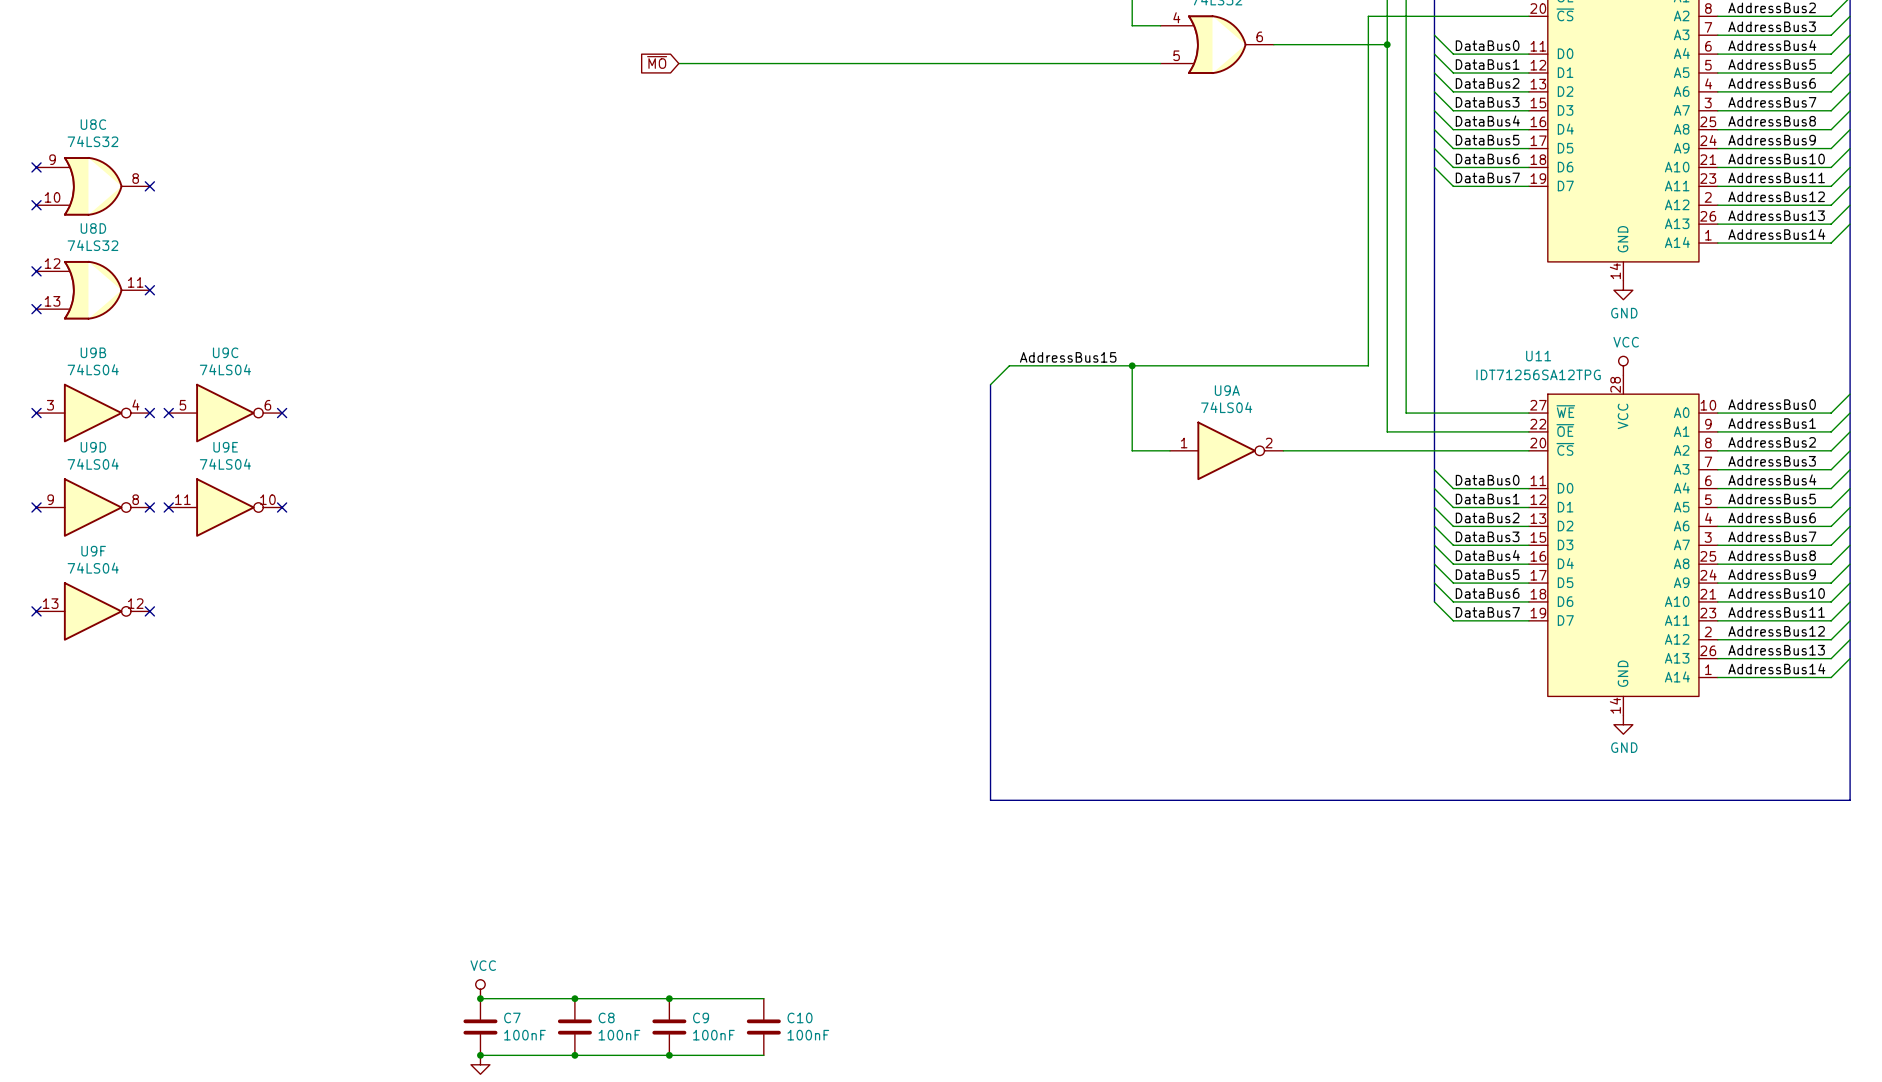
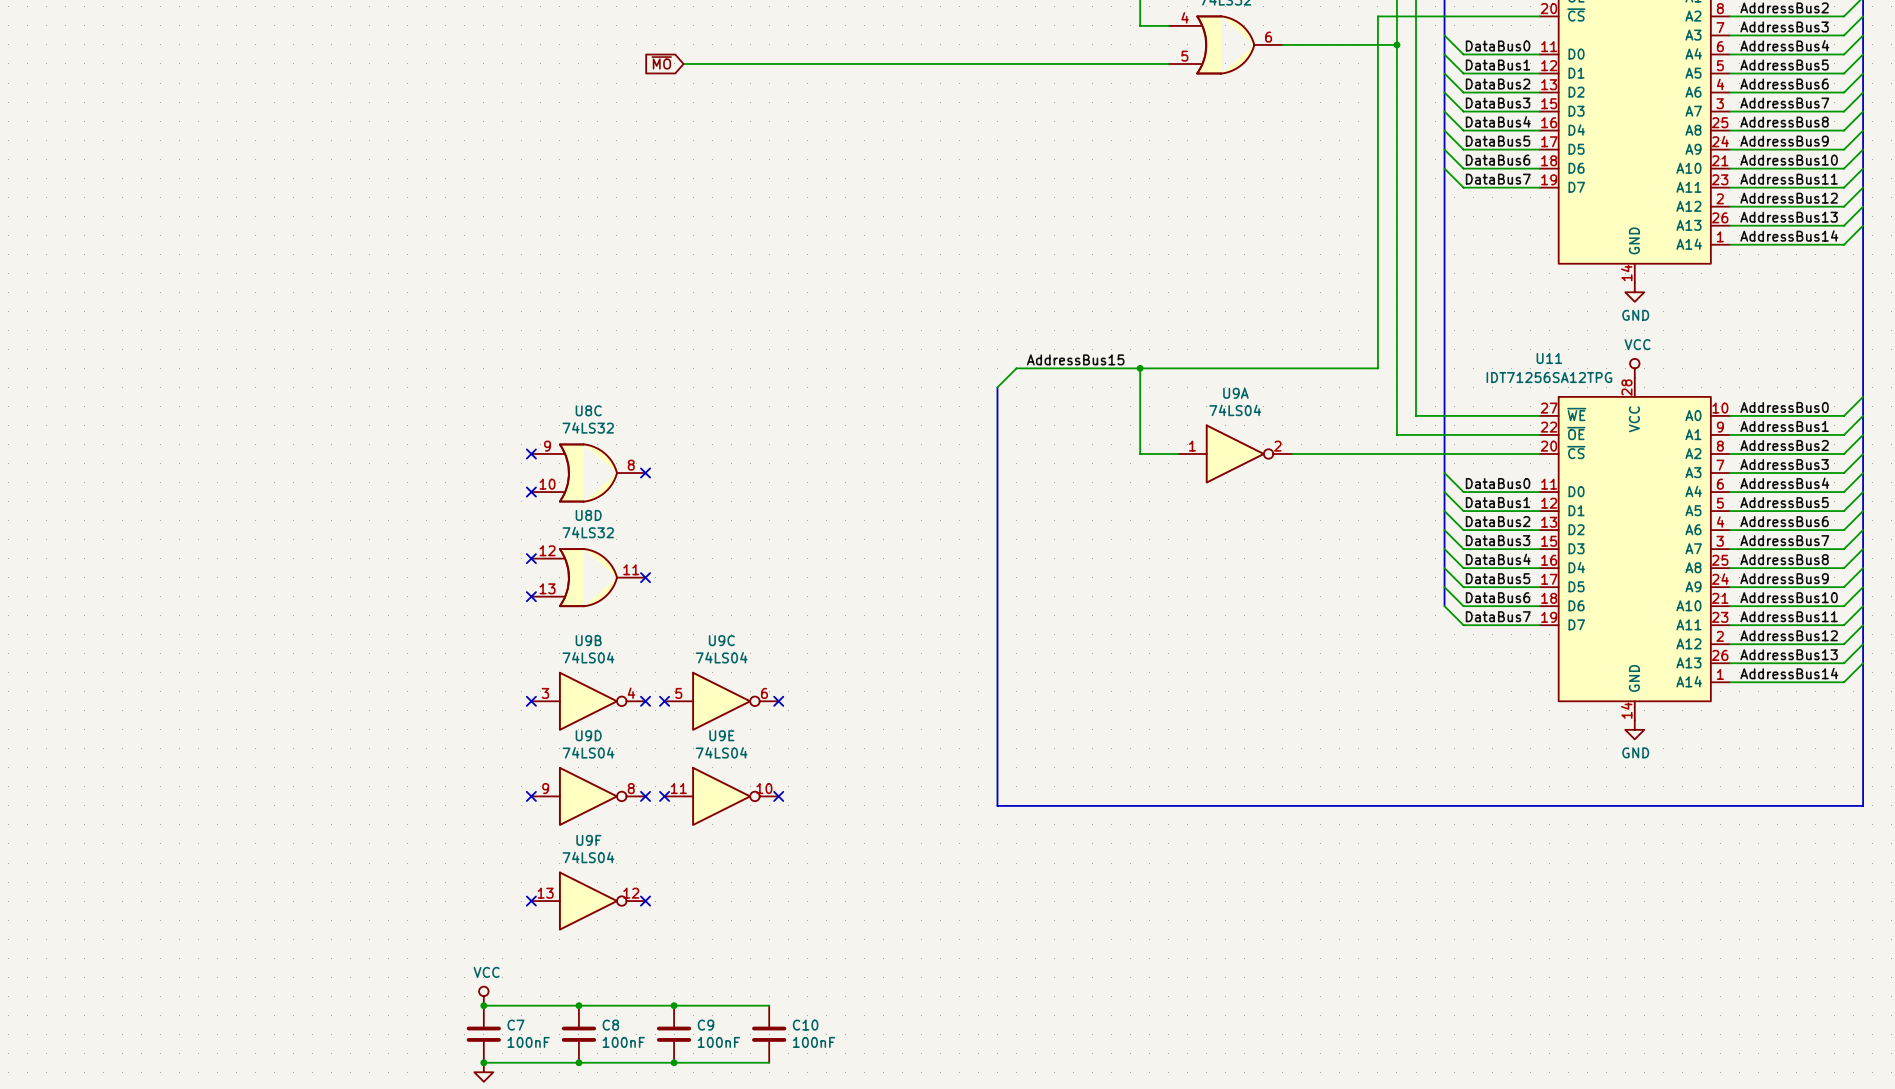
no-connect mark: (36, 167) -> none
U8C position: (93, 186) -> (588, 473)
no-connect mark: (149, 186) -> none
no-connect mark: (36, 205) -> none
no-connect mark: (36, 271) -> none
U8D position: (93, 290) -> (588, 577)
no-connect mark: (149, 290) -> none
no-connect mark: (36, 309) -> none
no-connect mark: (36, 413) -> none
U9B position: (93, 413) -> (588, 701)
no-connect mark: (149, 413) -> none
no-connect mark: (168, 413) -> none
U9C position: (225, 413) -> (721, 701)
no-connect mark: (282, 413) -> none
no-connect mark: none -> (531, 453)
no-connect mark: none -> (645, 473)
no-connect mark: none -> (531, 492)
no-connect mark: (36, 507) -> none
U9D position: (93, 507) -> (588, 796)
no-connect mark: (149, 507) -> none
no-connect mark: (168, 507) -> none
U9E position: (225, 507) -> (721, 796)
no-connect mark: (282, 507) -> none
no-connect mark: none -> (531, 558)
no-connect mark: none -> (645, 577)
no-connect mark: none -> (531, 596)
no-connect mark: (36, 611) -> none
U9F position: (93, 611) -> (588, 901)
no-connect mark: (149, 611) -> none
no-connect mark: none -> (531, 701)
no-connect mark: none -> (645, 701)
no-connect mark: none -> (664, 701)
no-connect mark: none -> (778, 701)
no-connect mark: none -> (531, 796)
no-connect mark: none -> (645, 796)
no-connect mark: none -> (664, 796)
no-connect mark: none -> (778, 796)
no-connect mark: none -> (531, 901)
no-connect mark: none -> (645, 901)

